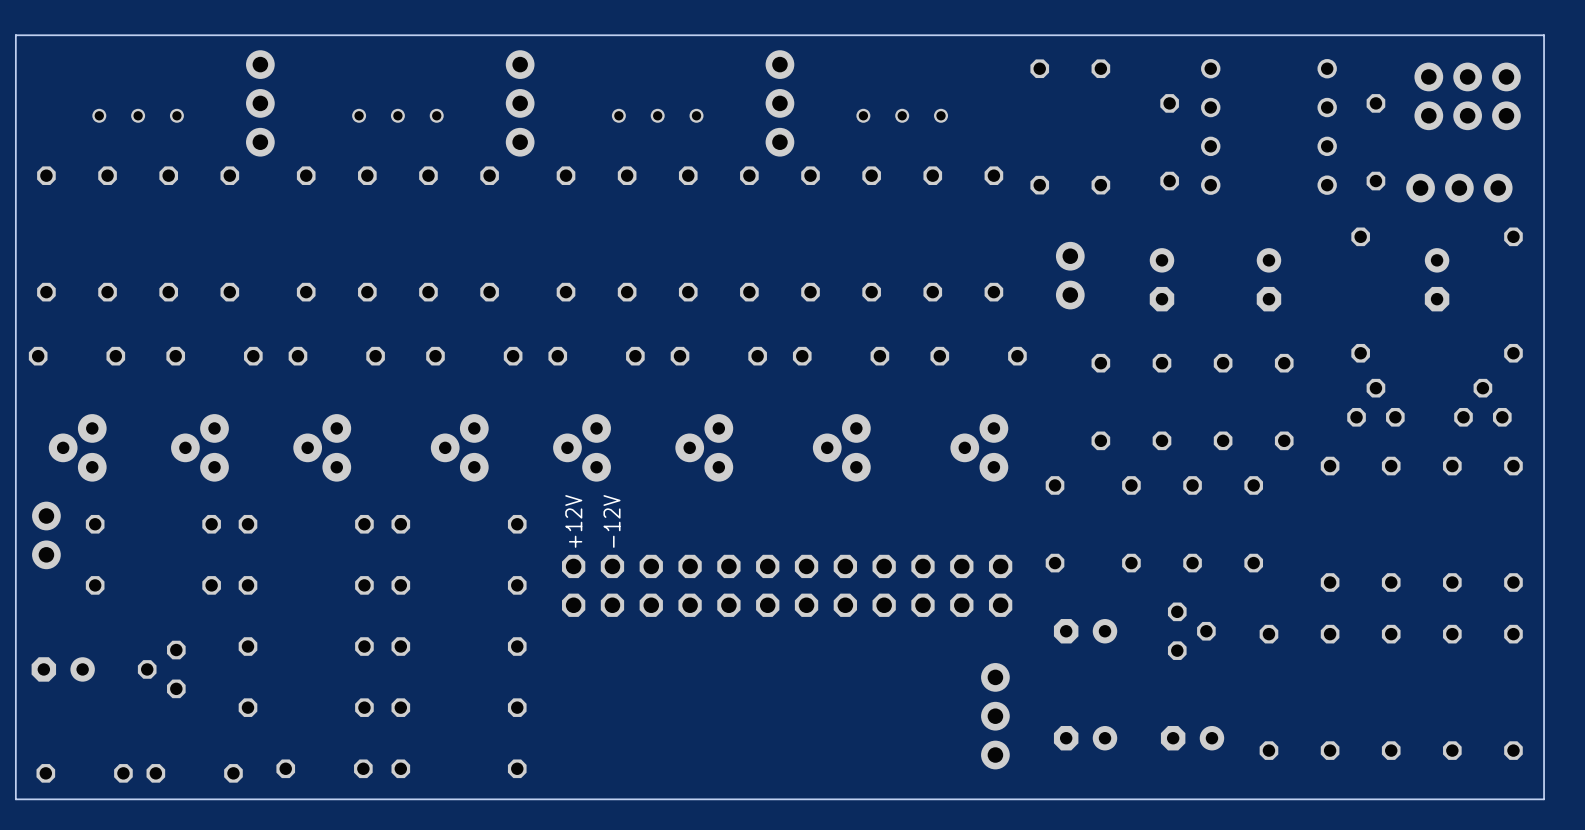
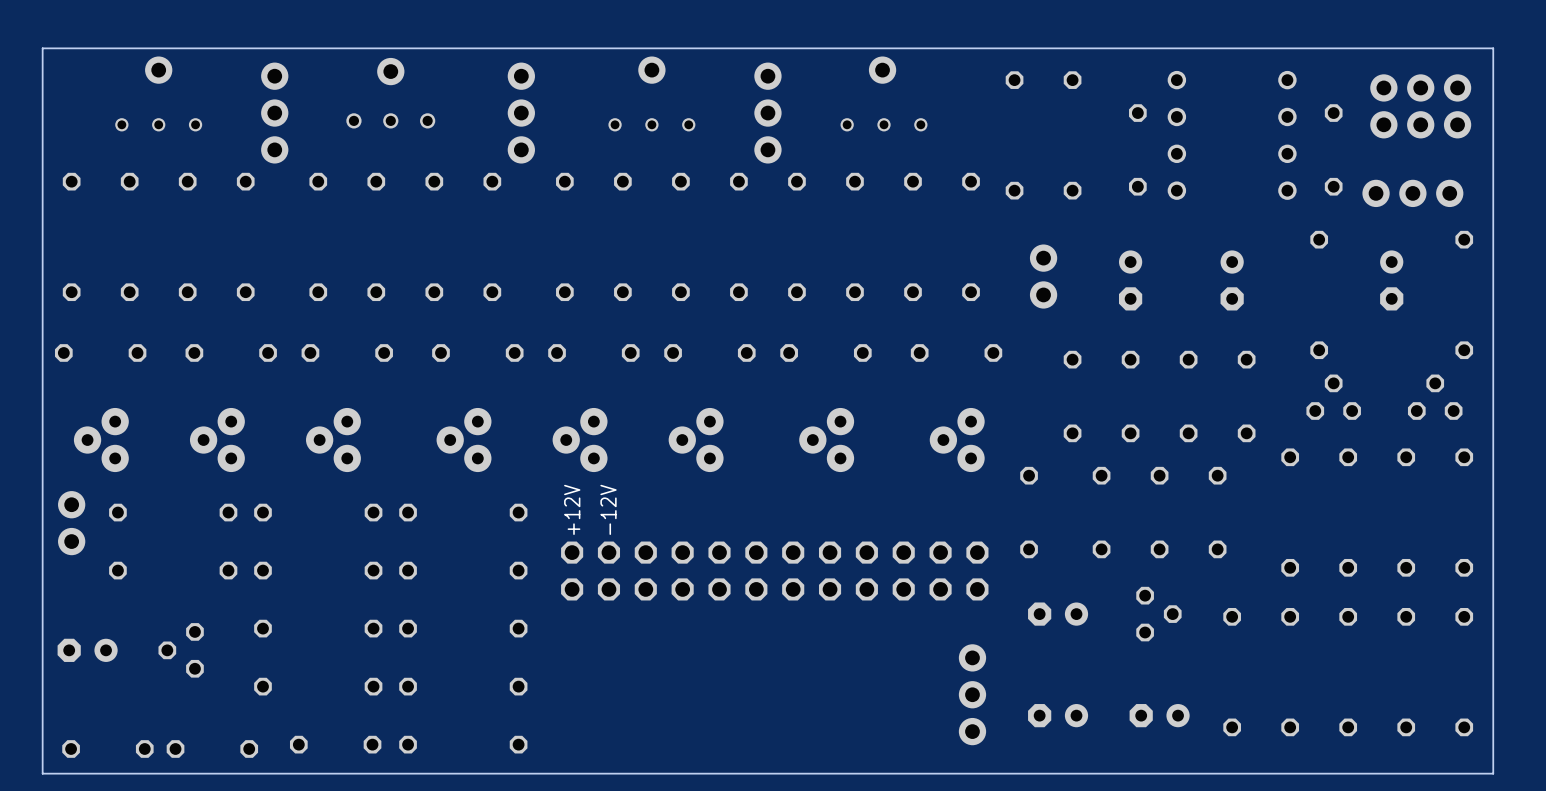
part: none -> (158, 70)
part: none -> (651, 70)
part: none -> (882, 70)
part: none -> (390, 71)
part: none -> (390, 120)
part: (397, 115) -> none

